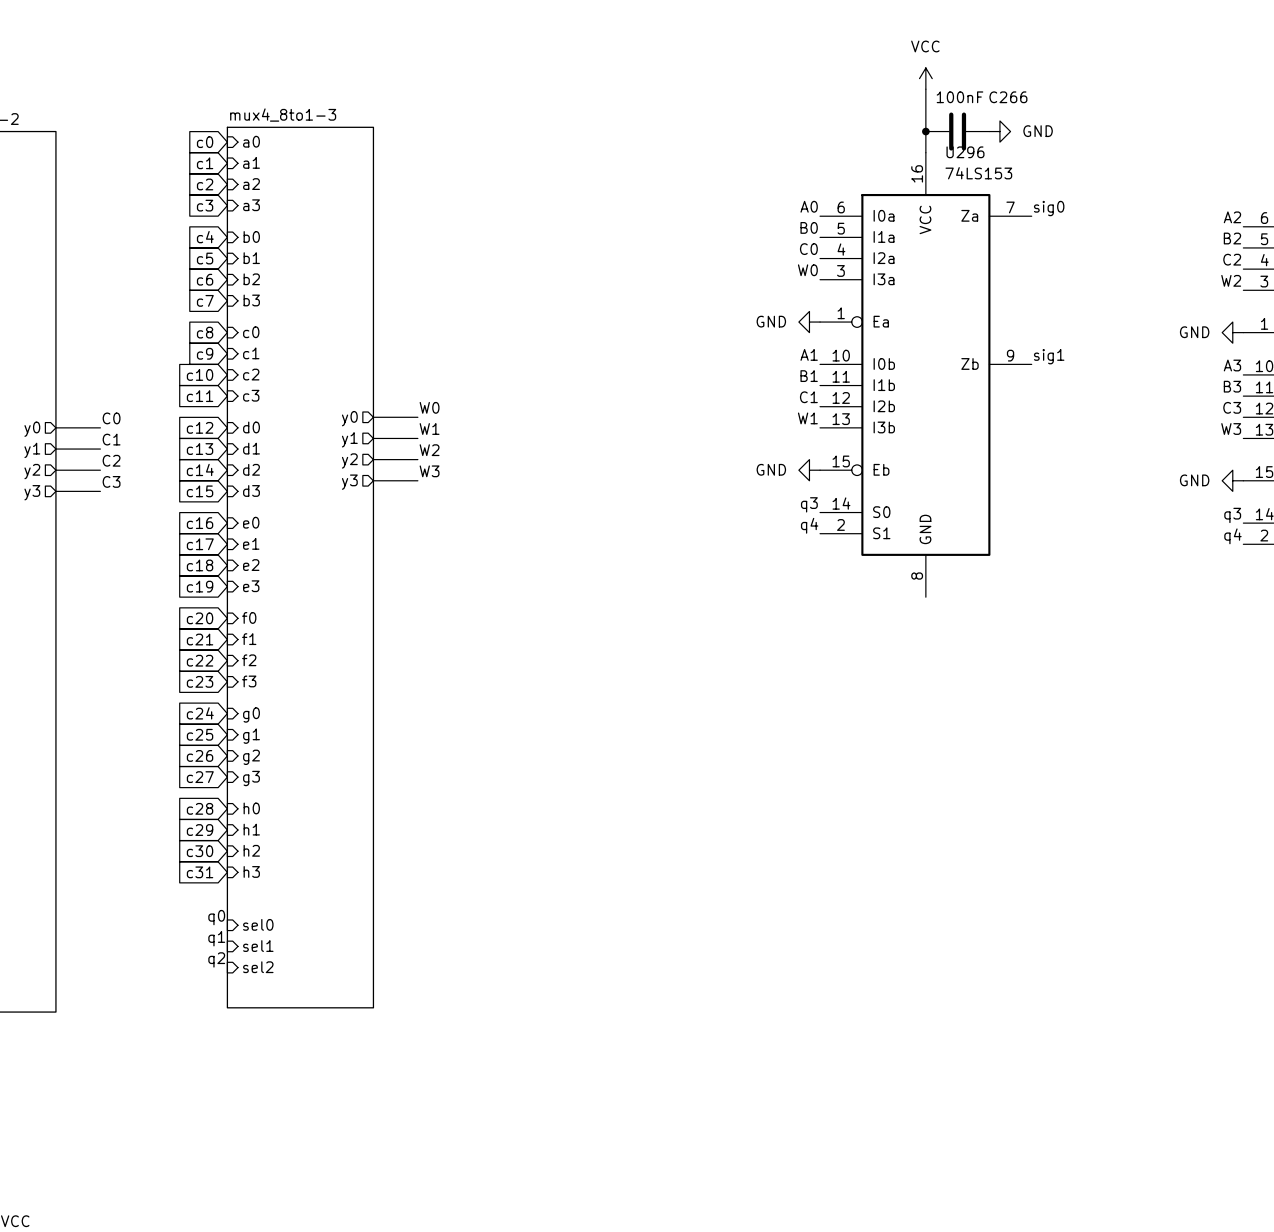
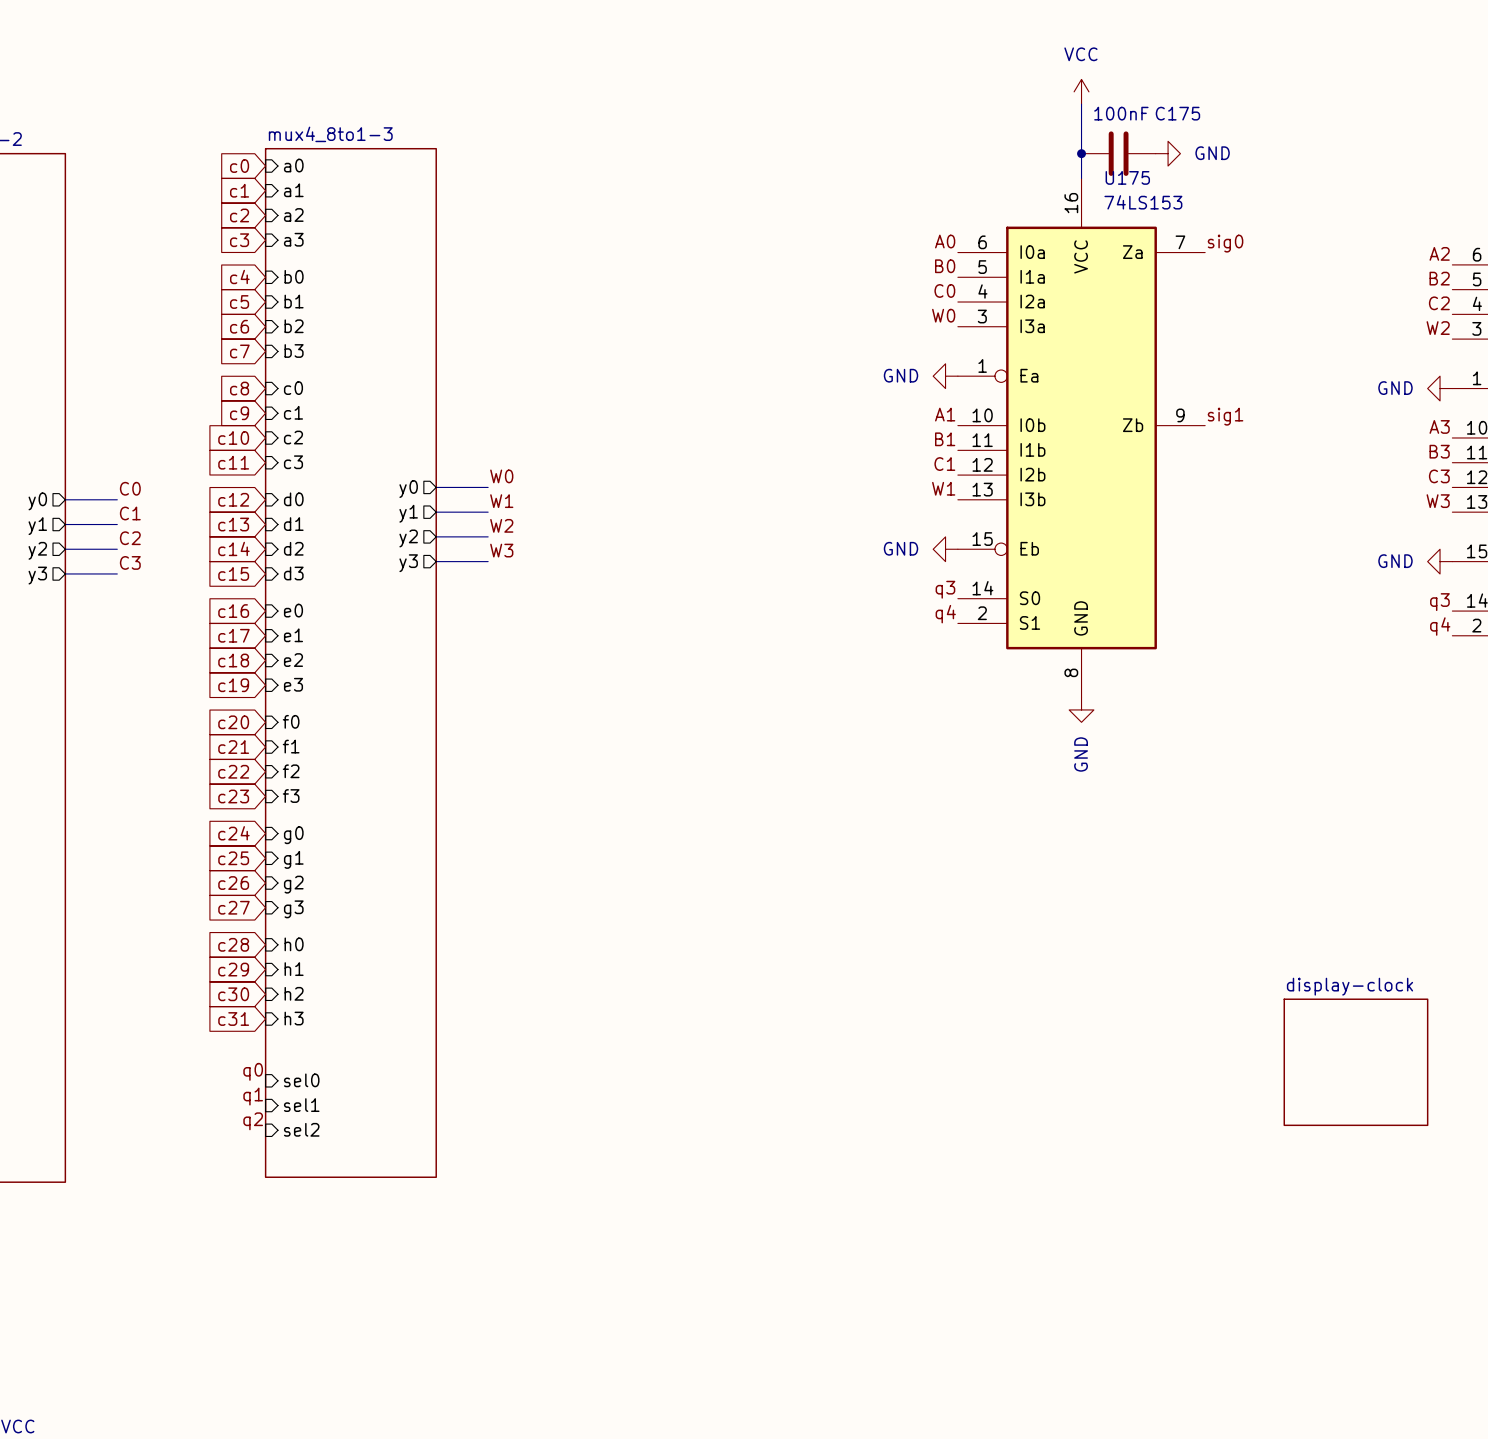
C266 name: C266 (1008, 97) -> C175 (1177, 113)
U296 name: U296 (965, 152) -> U175 (1127, 177)
power symbol: none -> GND (1081, 709)
sheet display-clock: none -> (1355, 1062)

